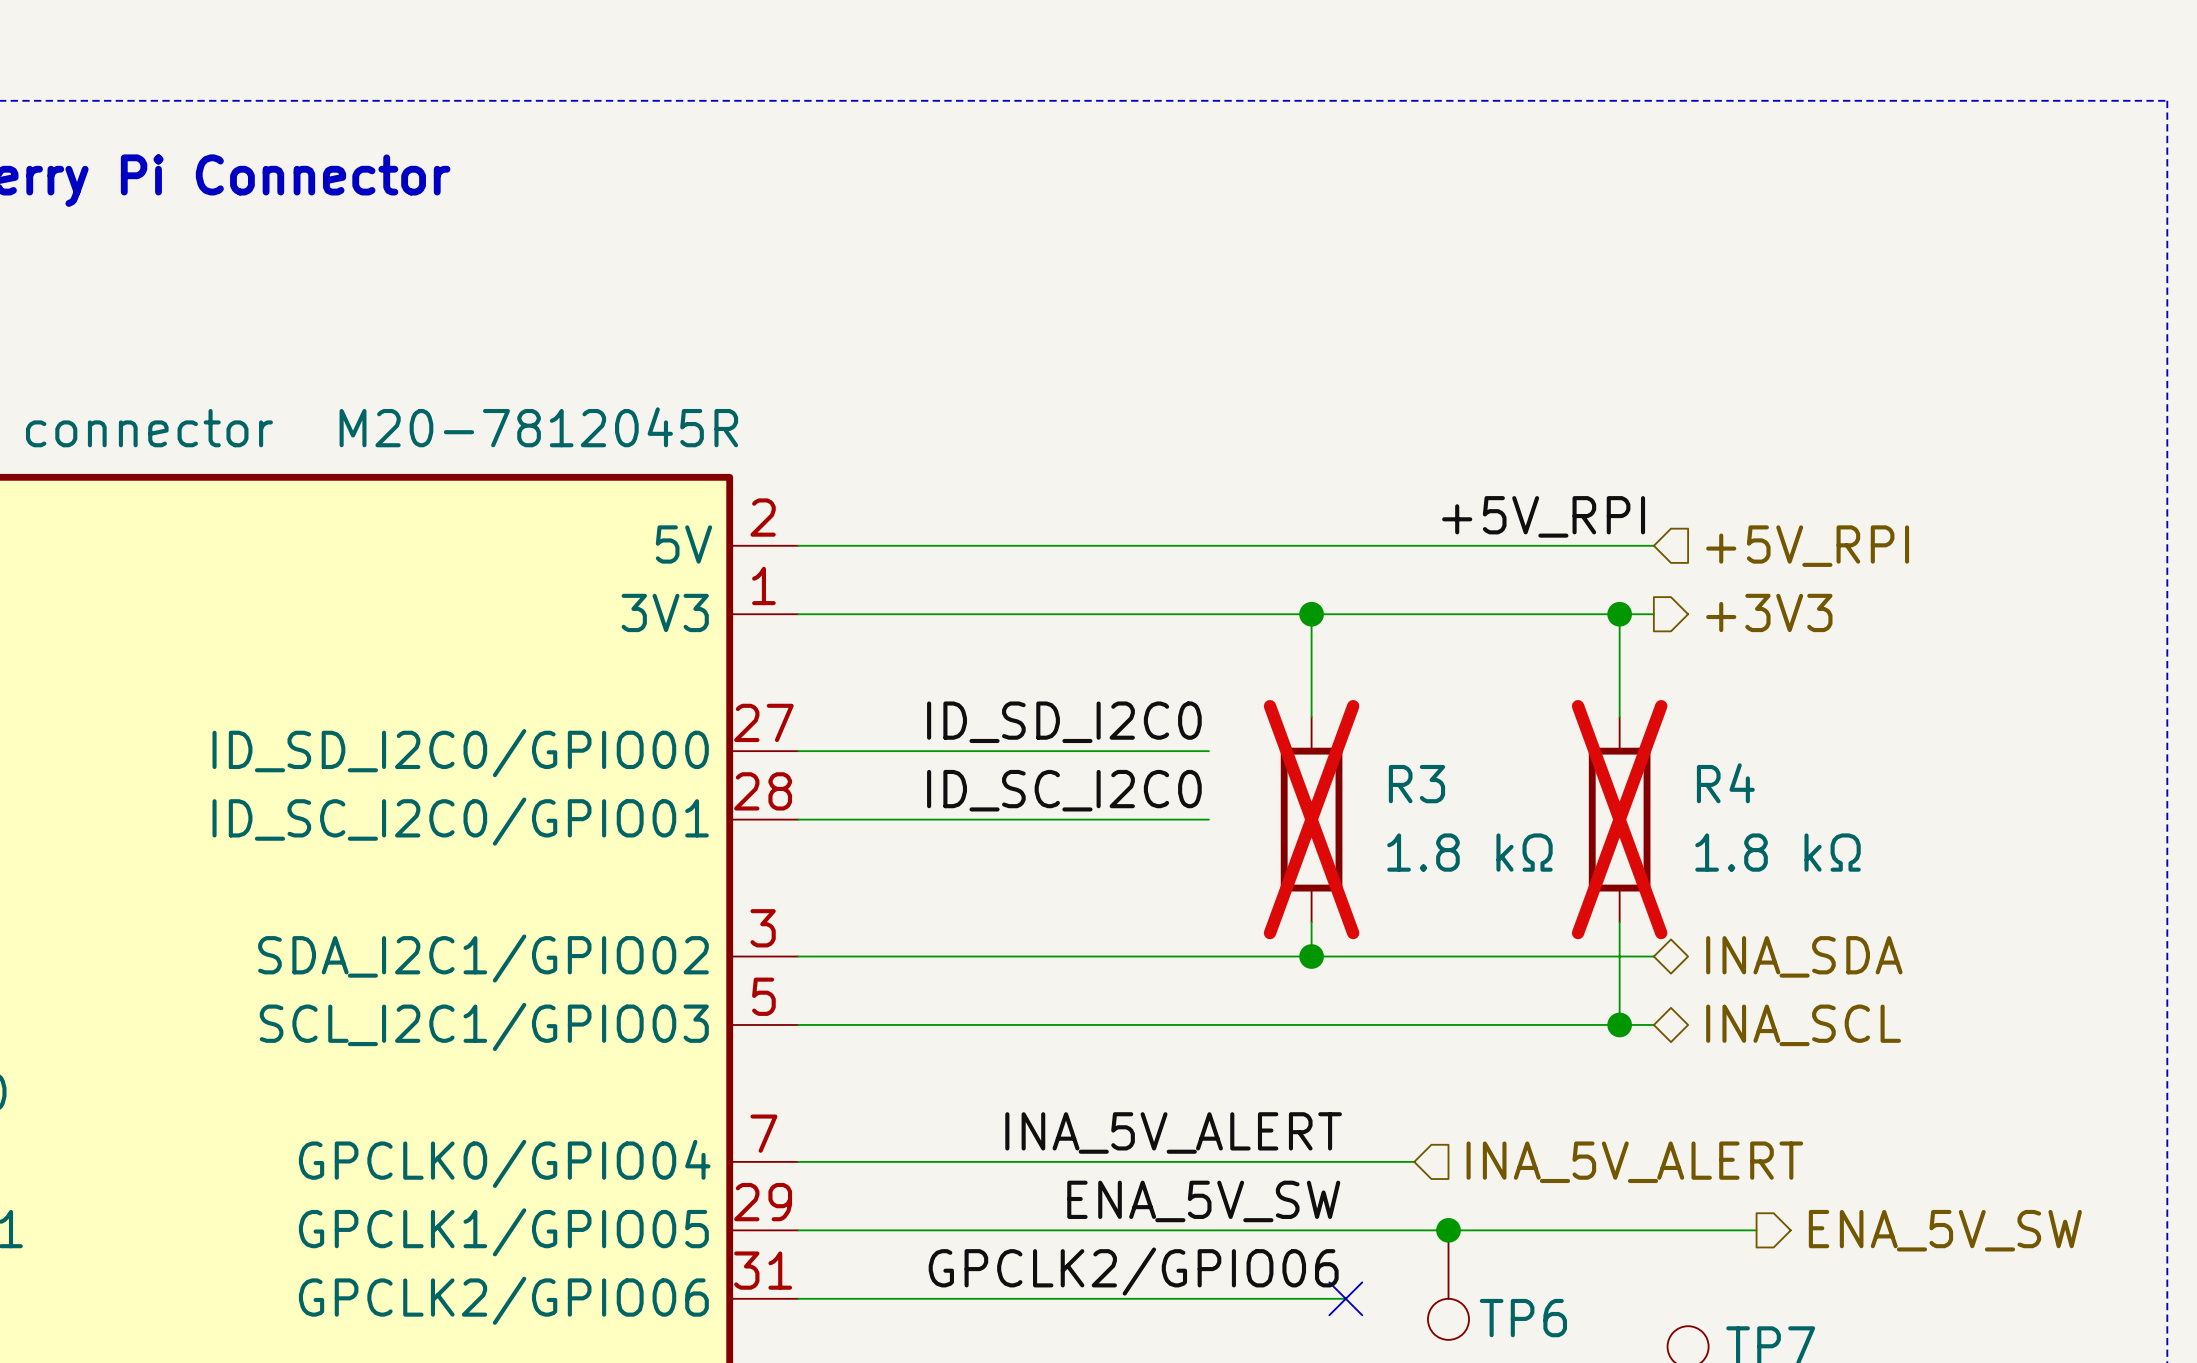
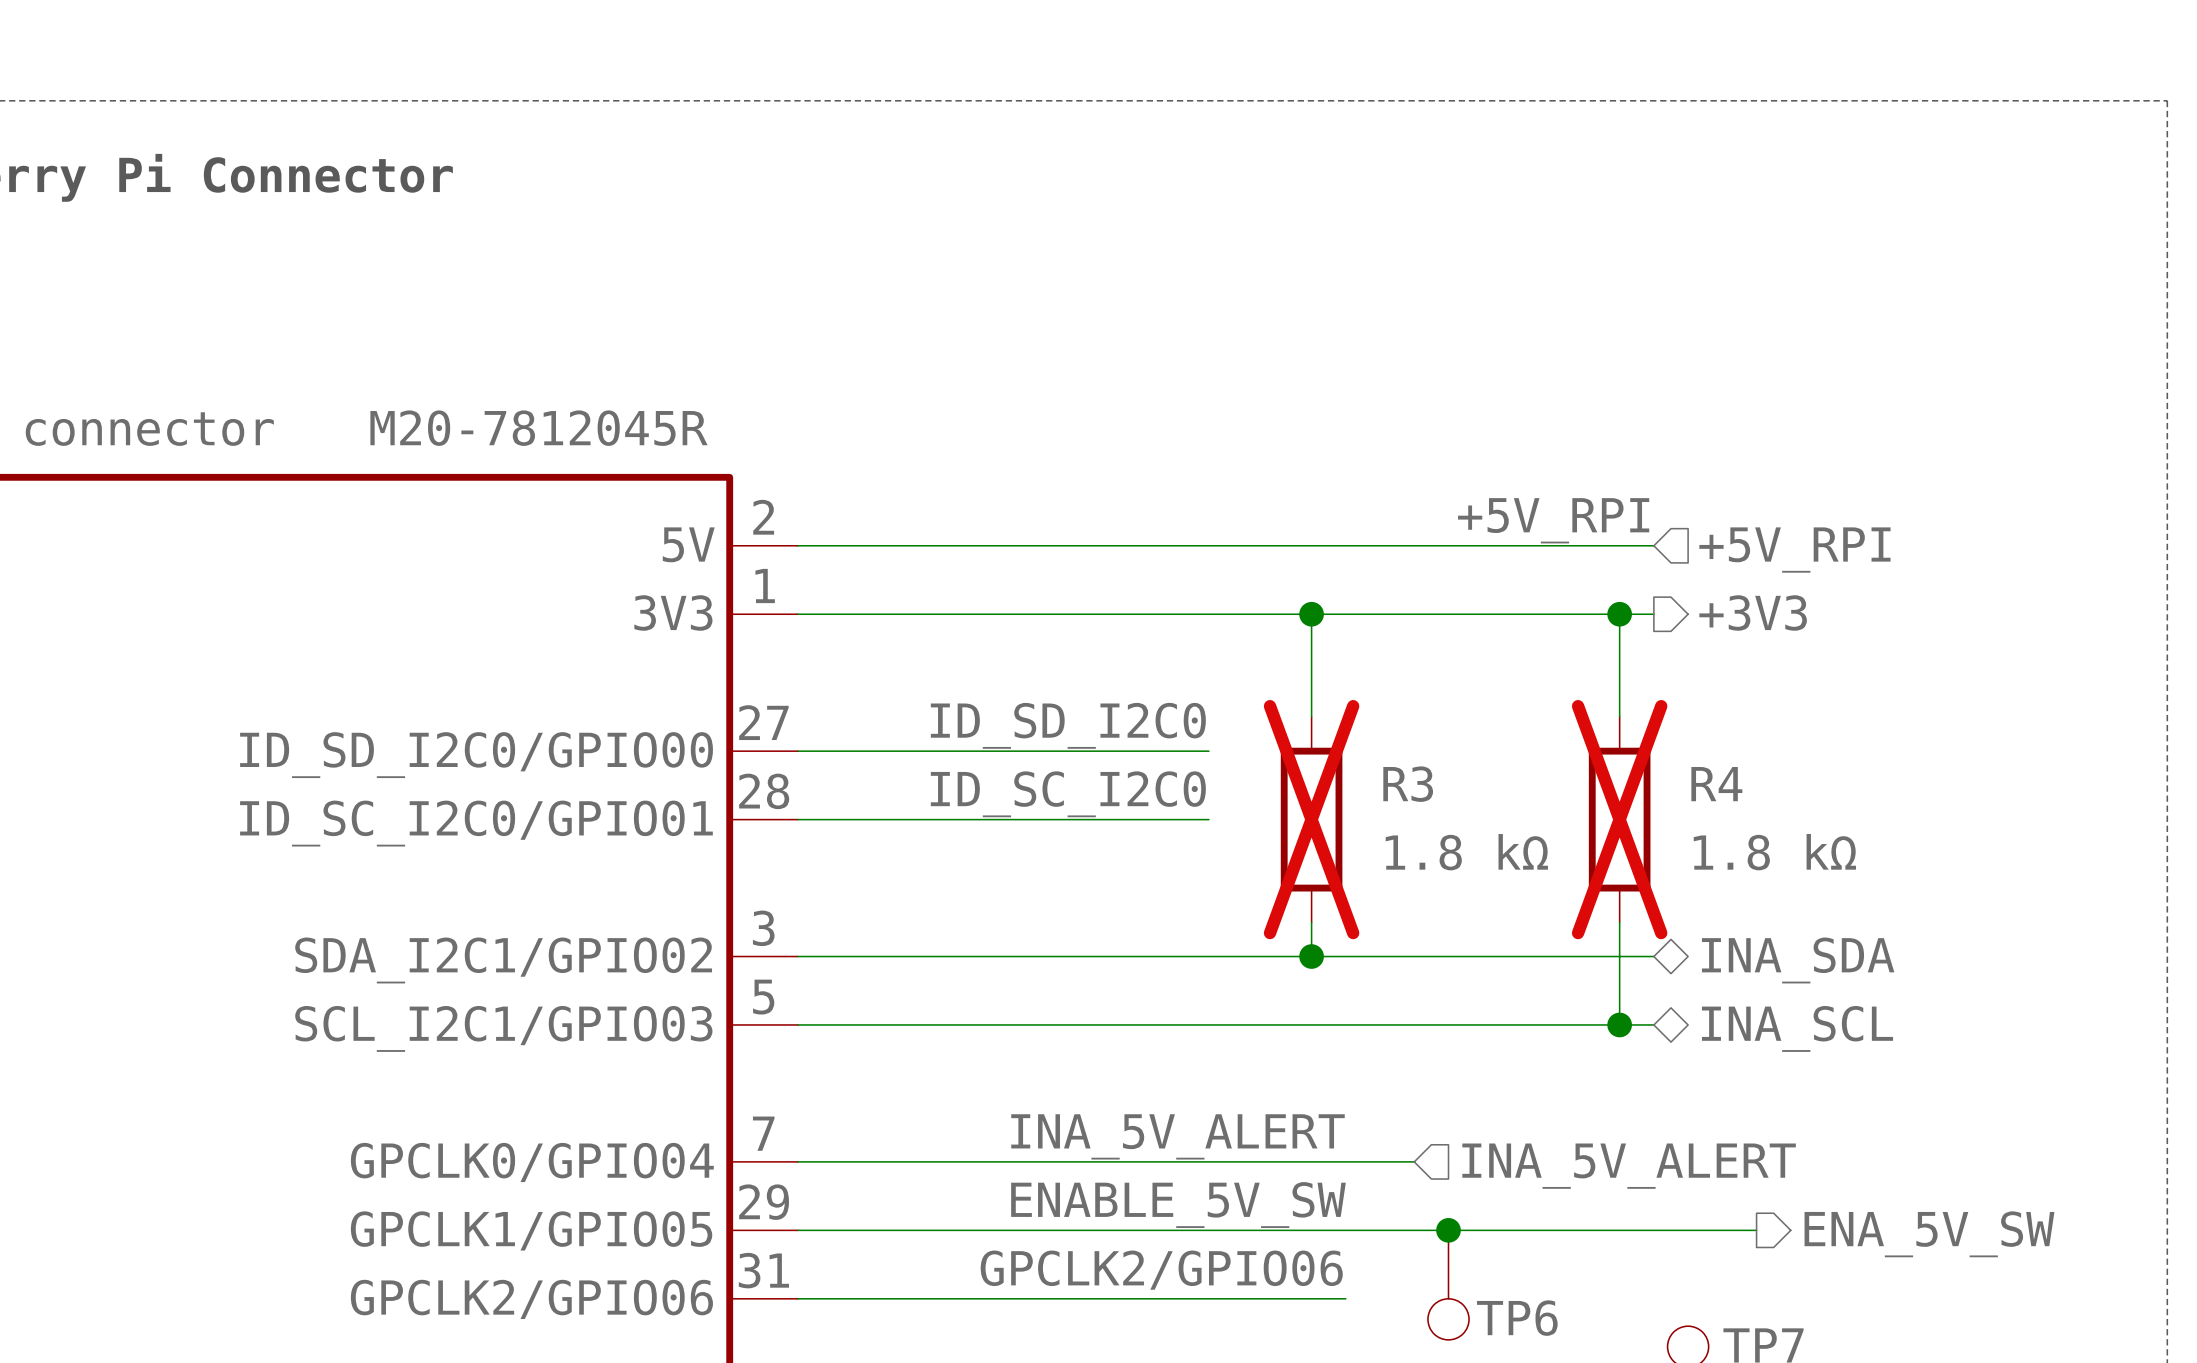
label: ENA_5V_SW (1203, 1201) -> ENABLE_5V_SW (1178, 1205)
no-connect mark: (1345, 1298) -> none

